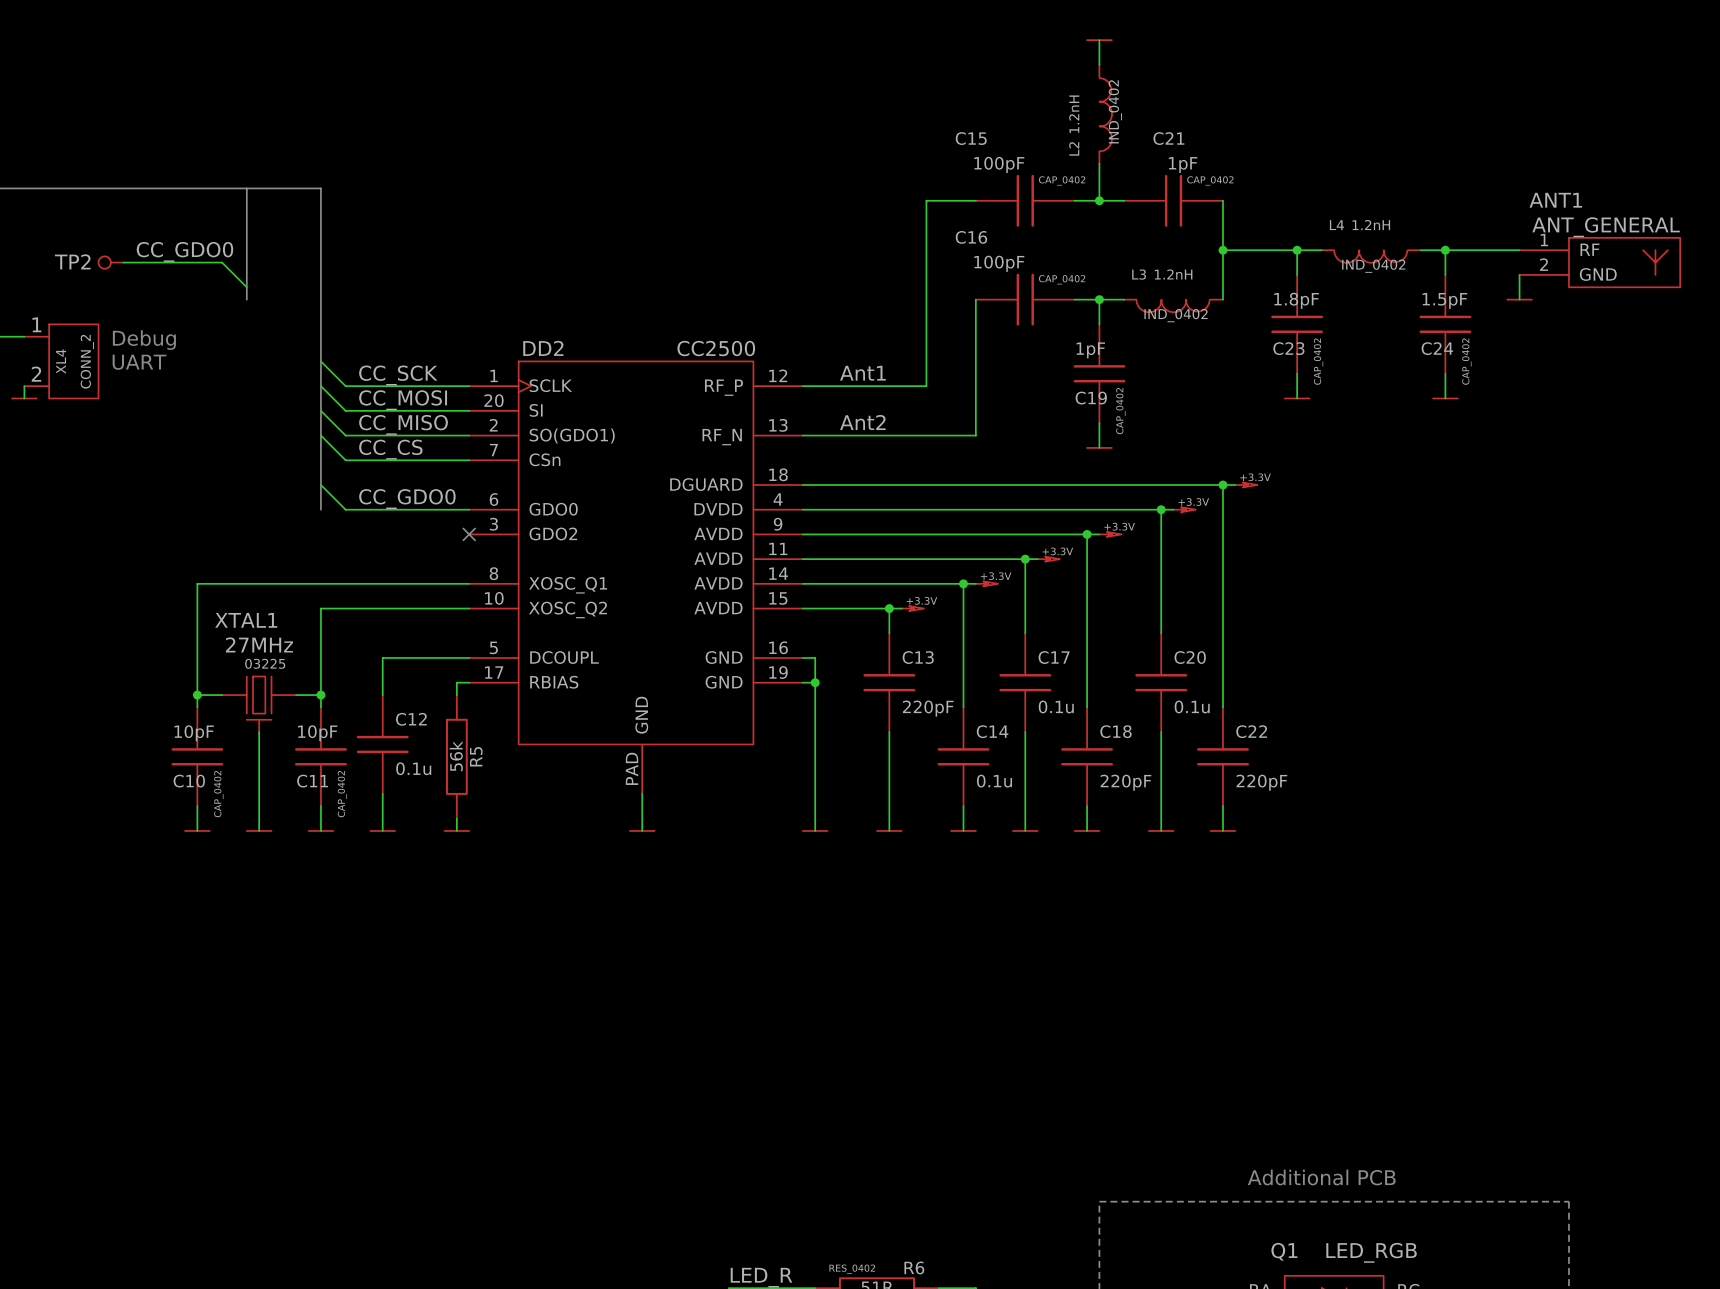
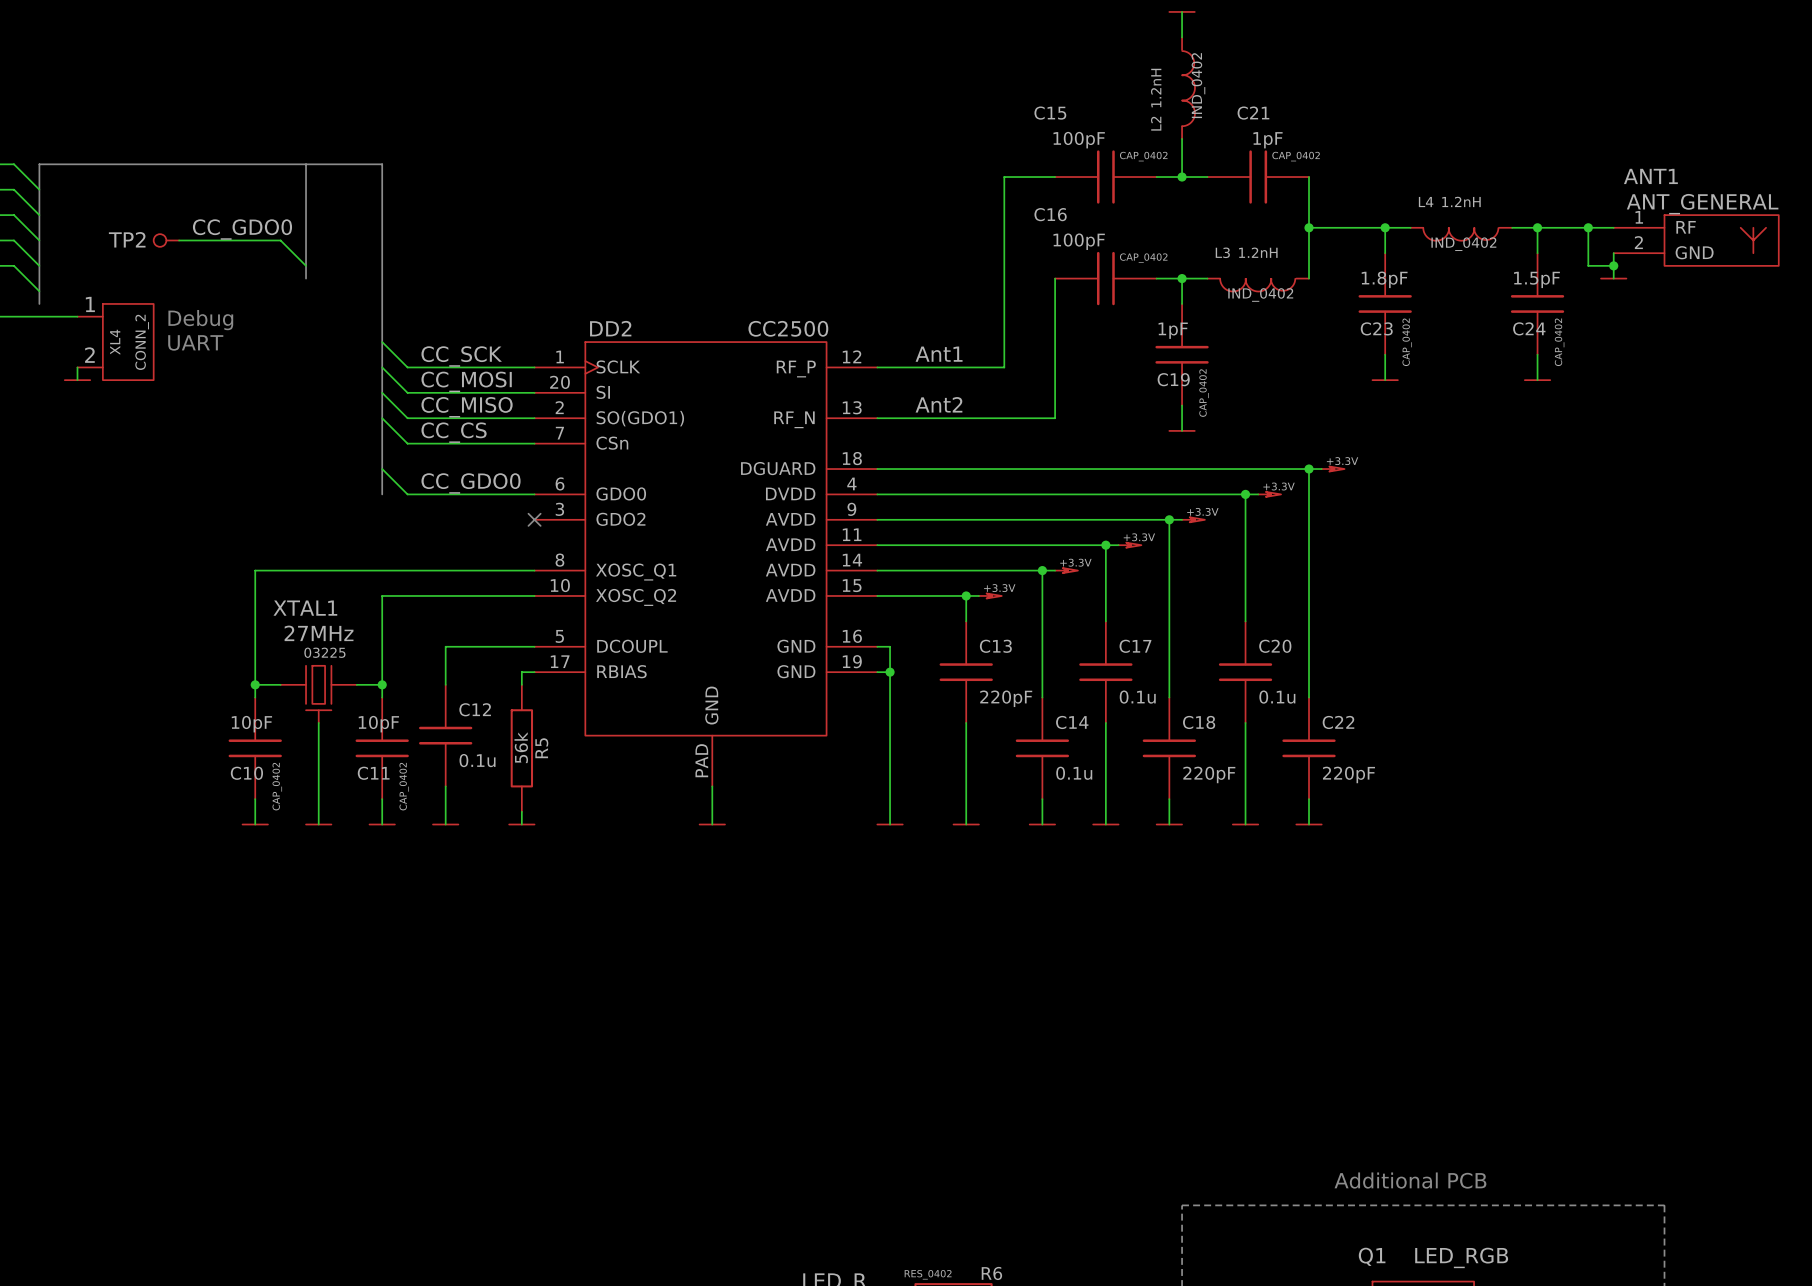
wire: none -> (1588, 227) (1588, 265) (1613, 265)
junction: none -> (1588, 227)
junction: none -> (1613, 265)

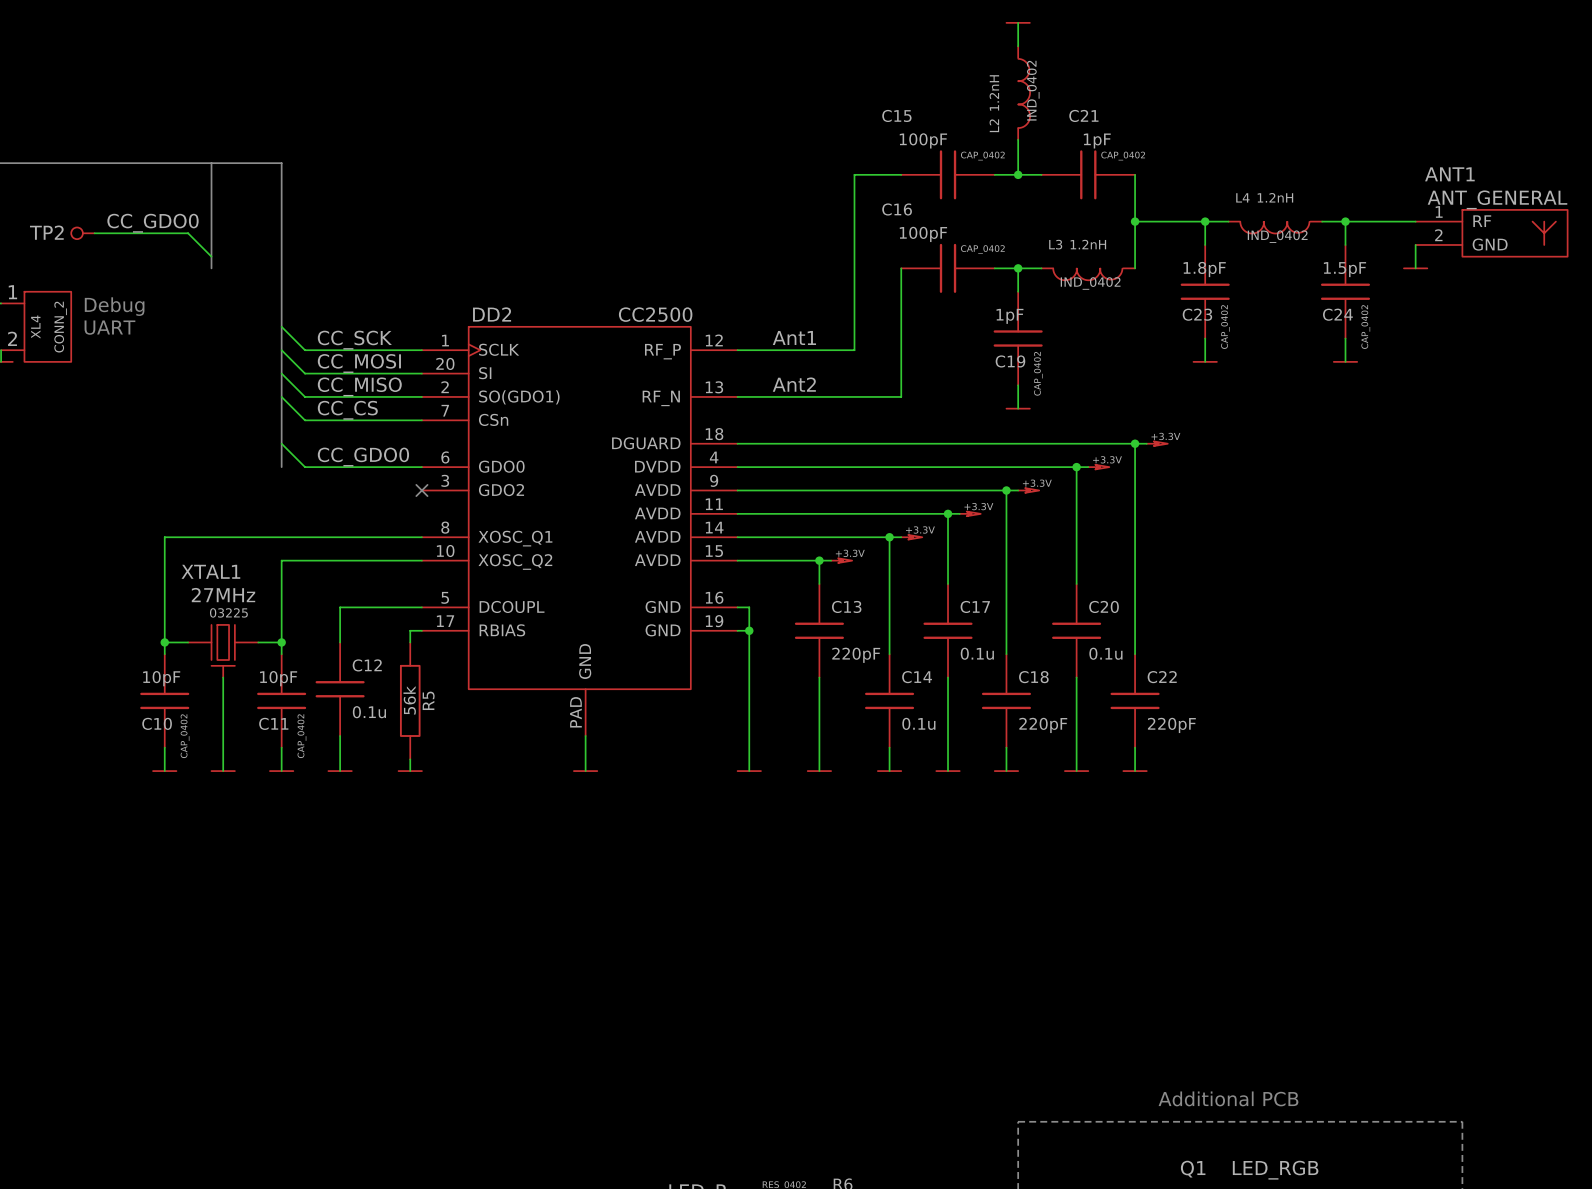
wire: (1588, 227) (1588, 265) (1613, 265) -> none
junction: (1588, 227) -> none
junction: (1613, 265) -> none

